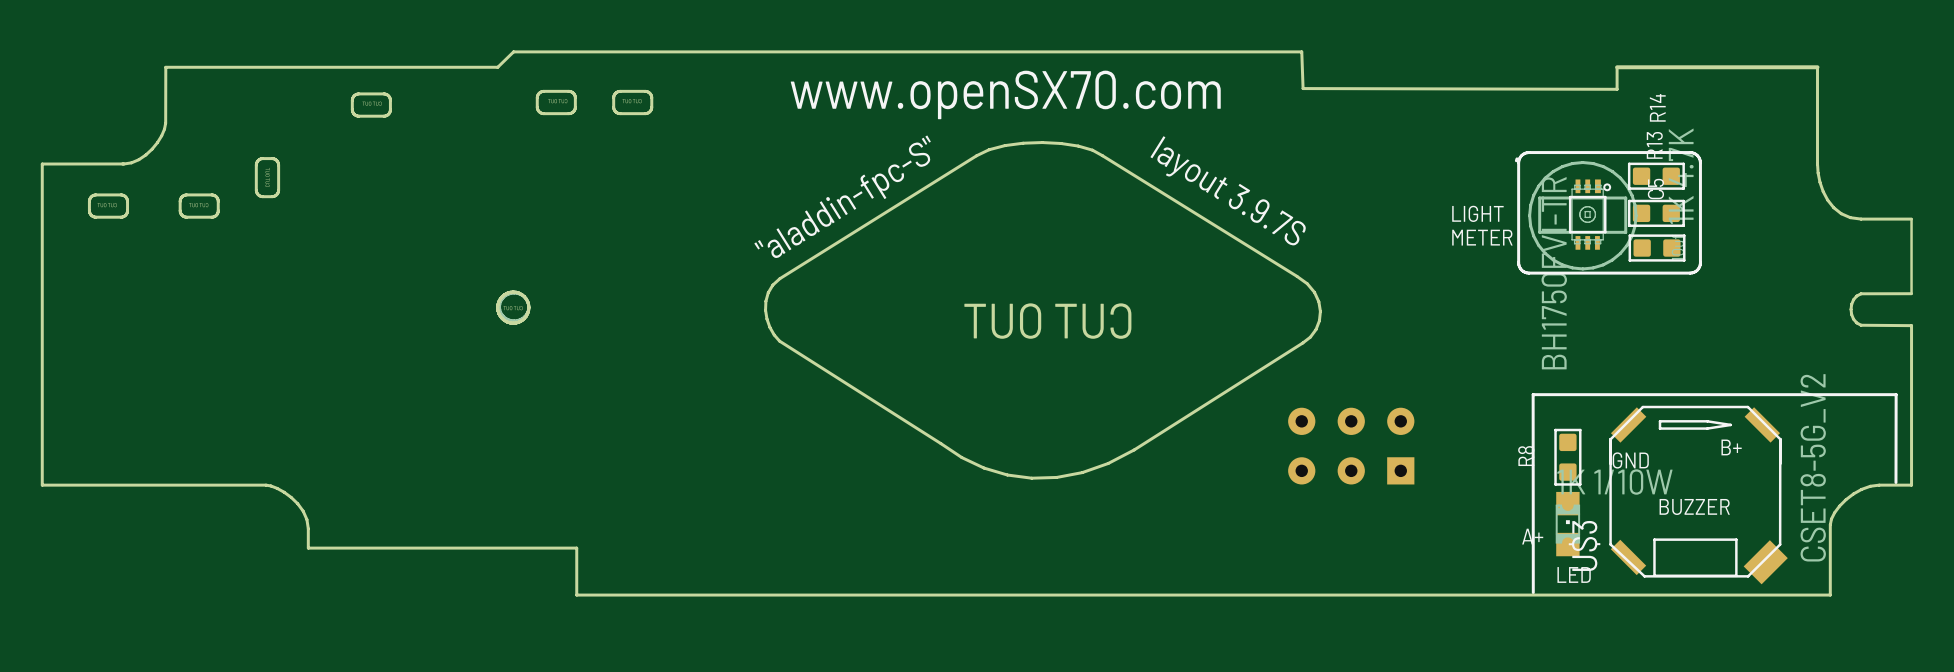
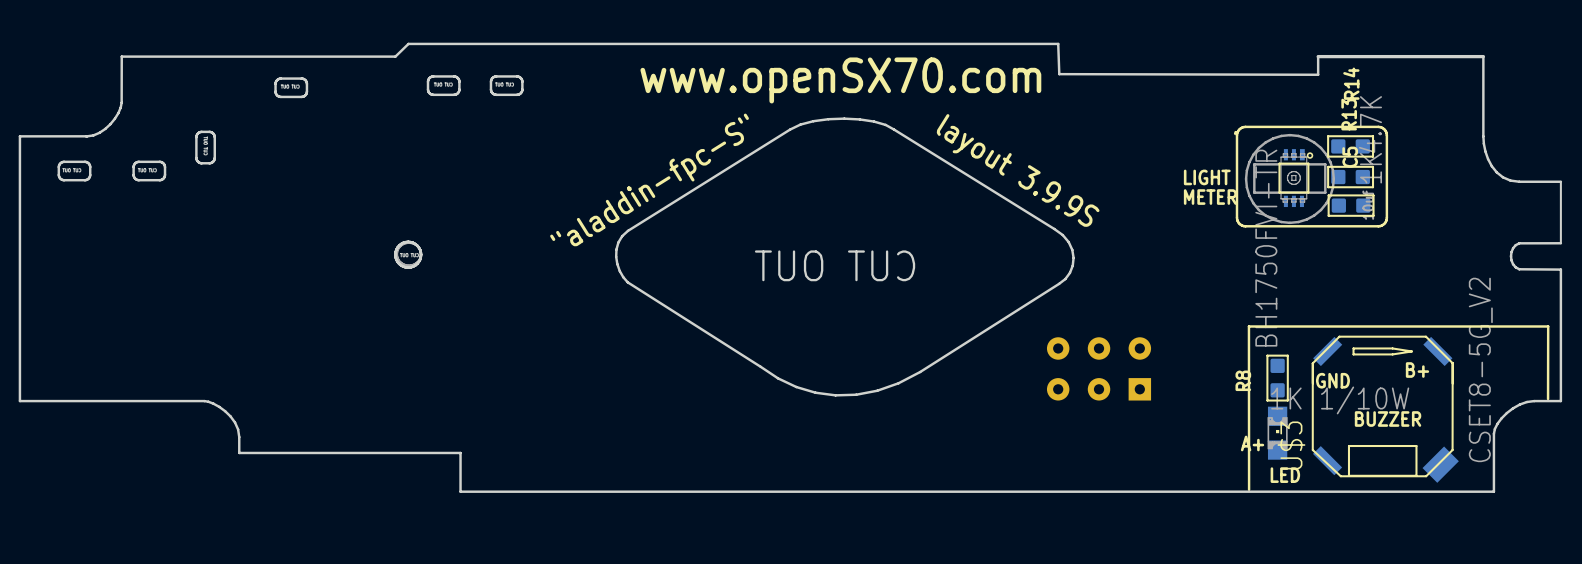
text: layout 3.9.7S (1228, 190) -> layout 3.9.9S (1018, 170)

